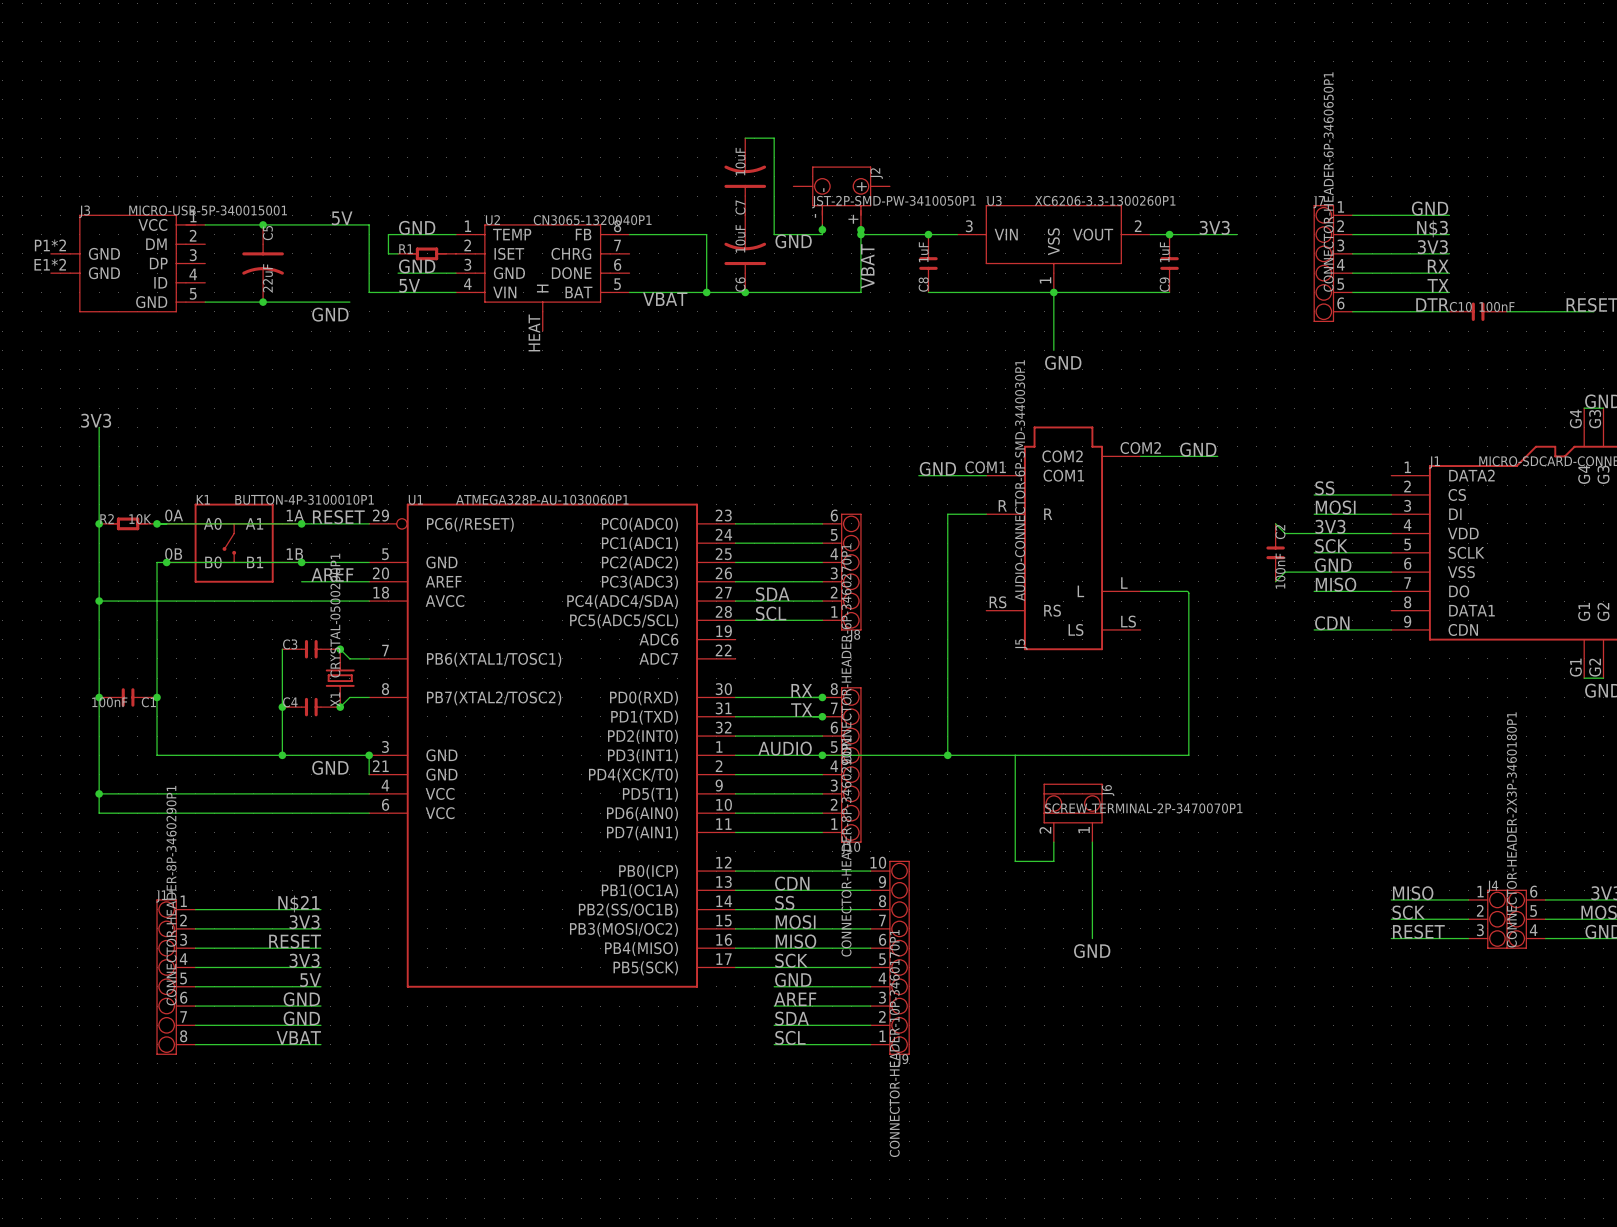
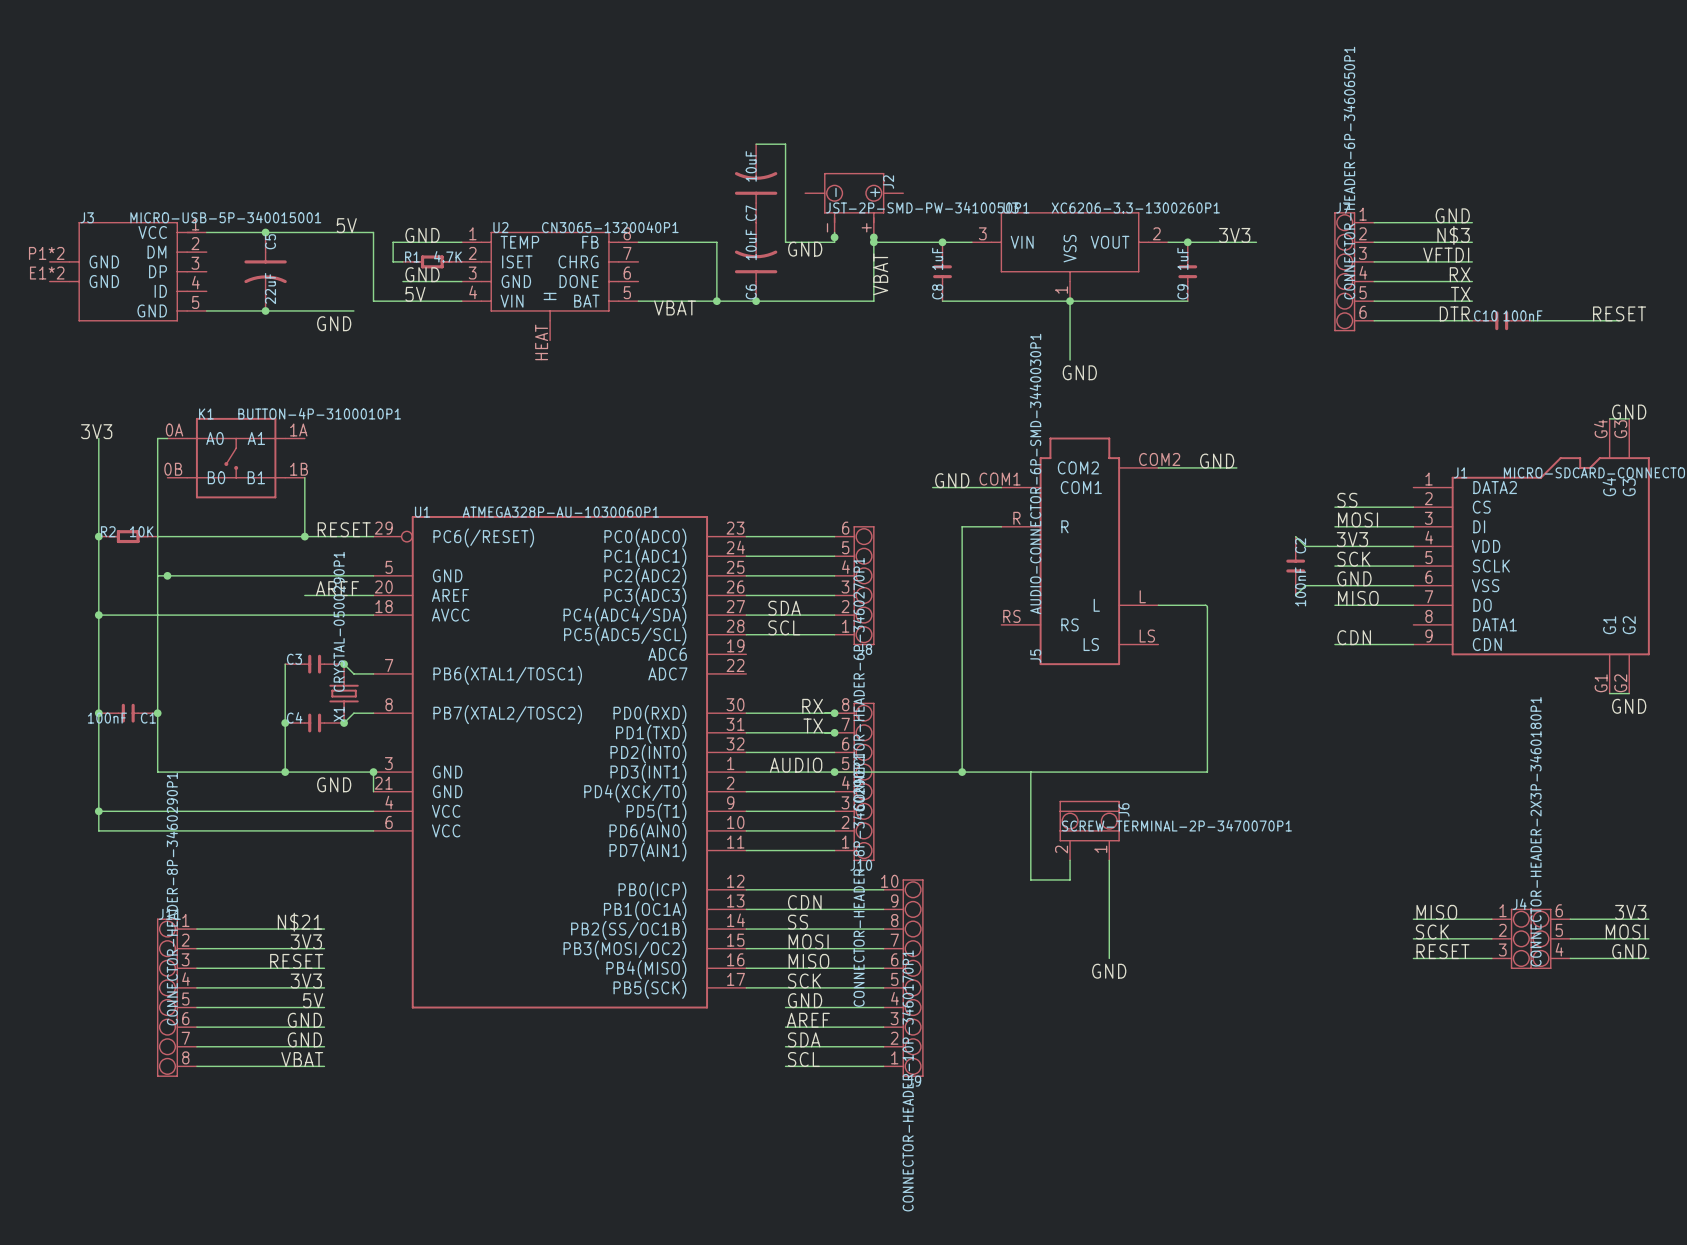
label: 3V3 (1432, 247) -> VFTDI (1446, 255)
R1 value: none -> 4.7K (447, 256)
wire: none -> (167, 438) (157, 438) (157, 575)
wire: none -> (304, 477) (304, 536)
junction: (157, 523) -> none
K1 position: (234, 543) -> (236, 458)
junction: (301, 562) -> none

